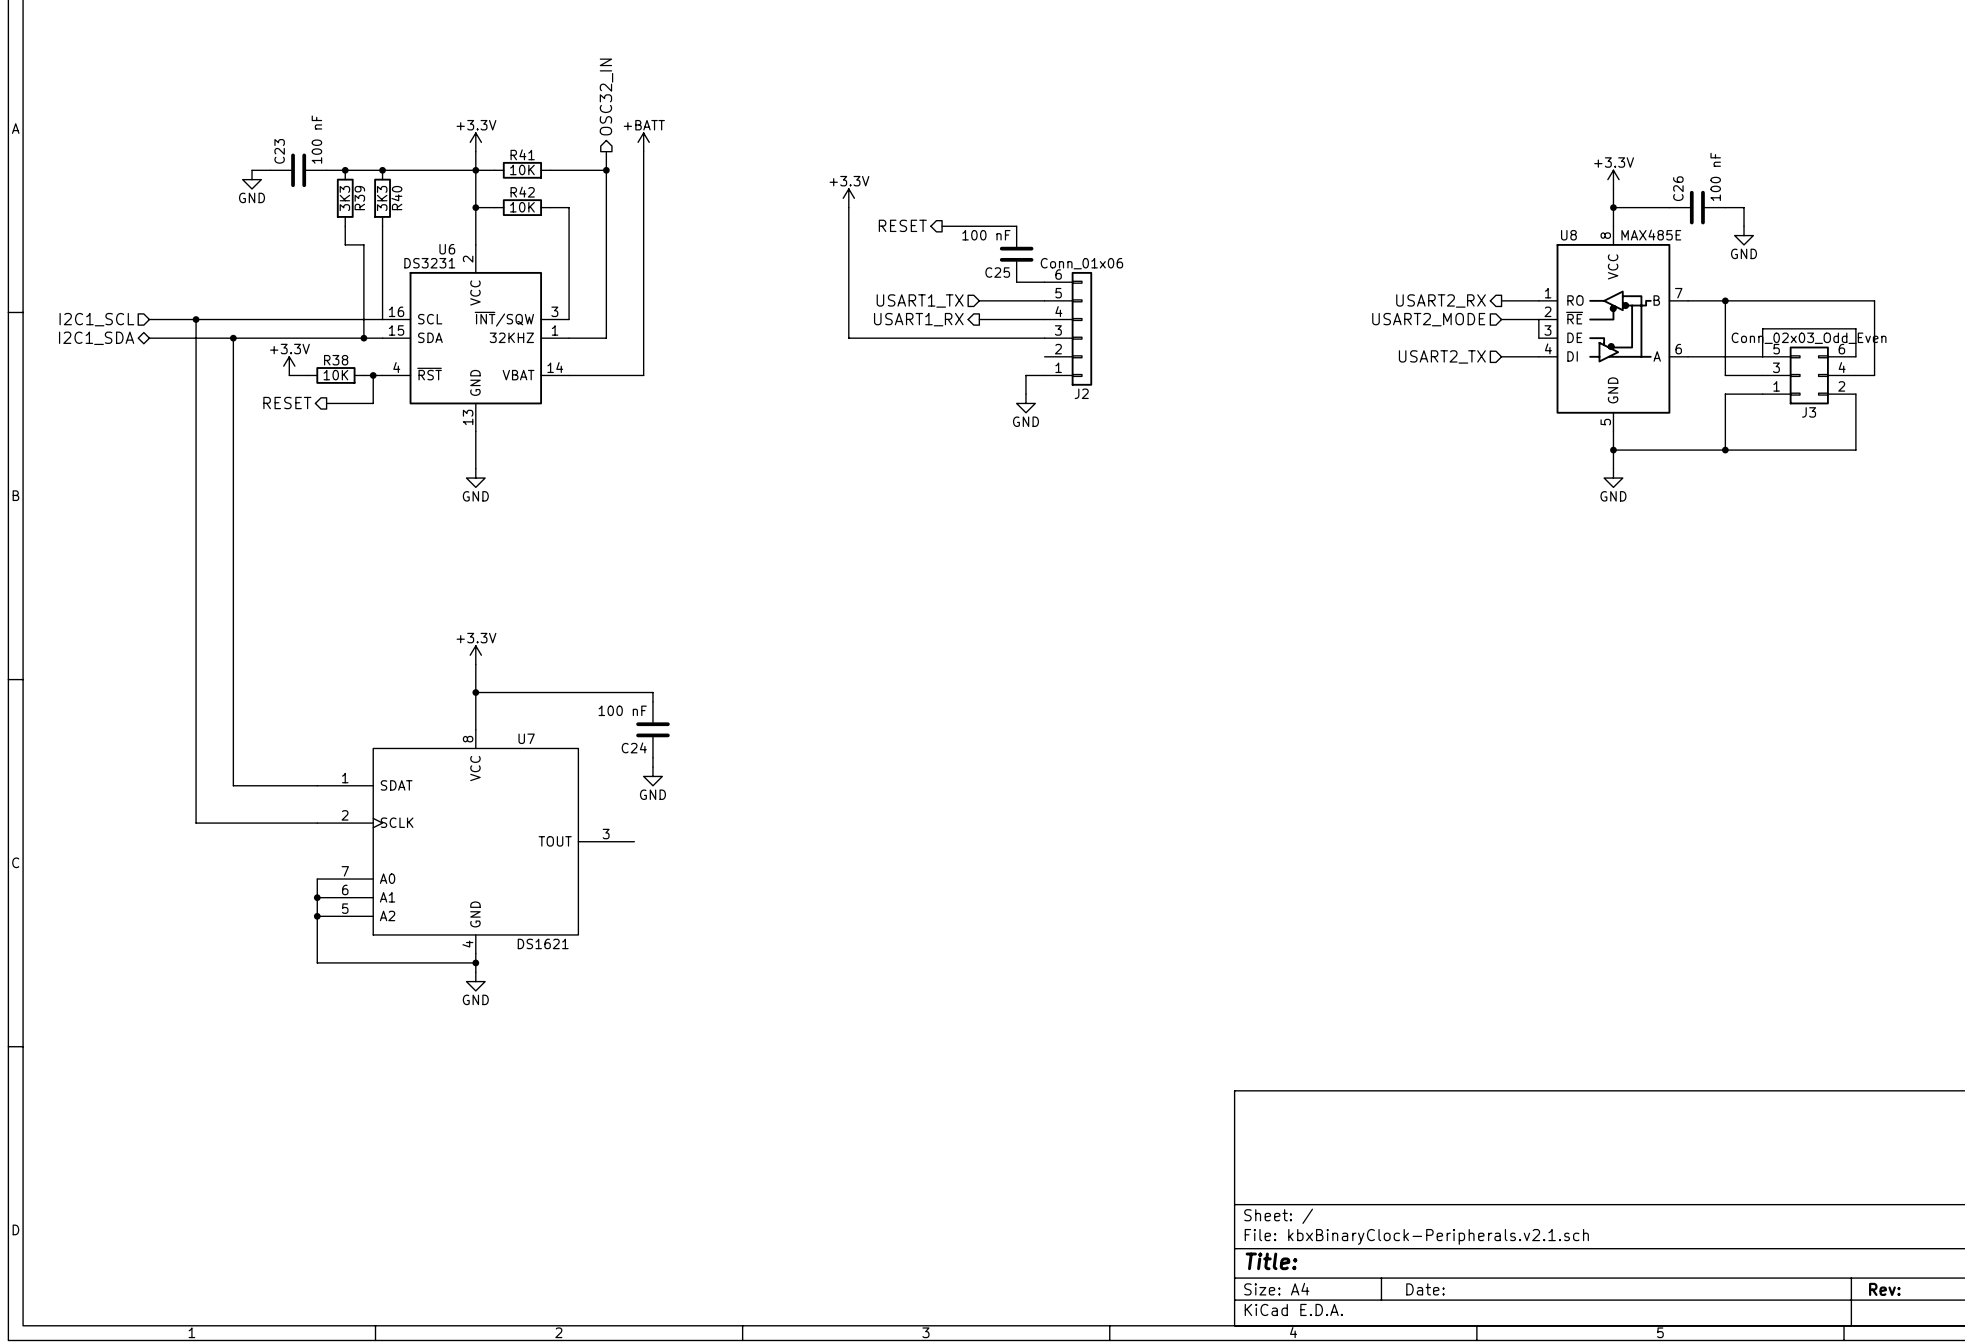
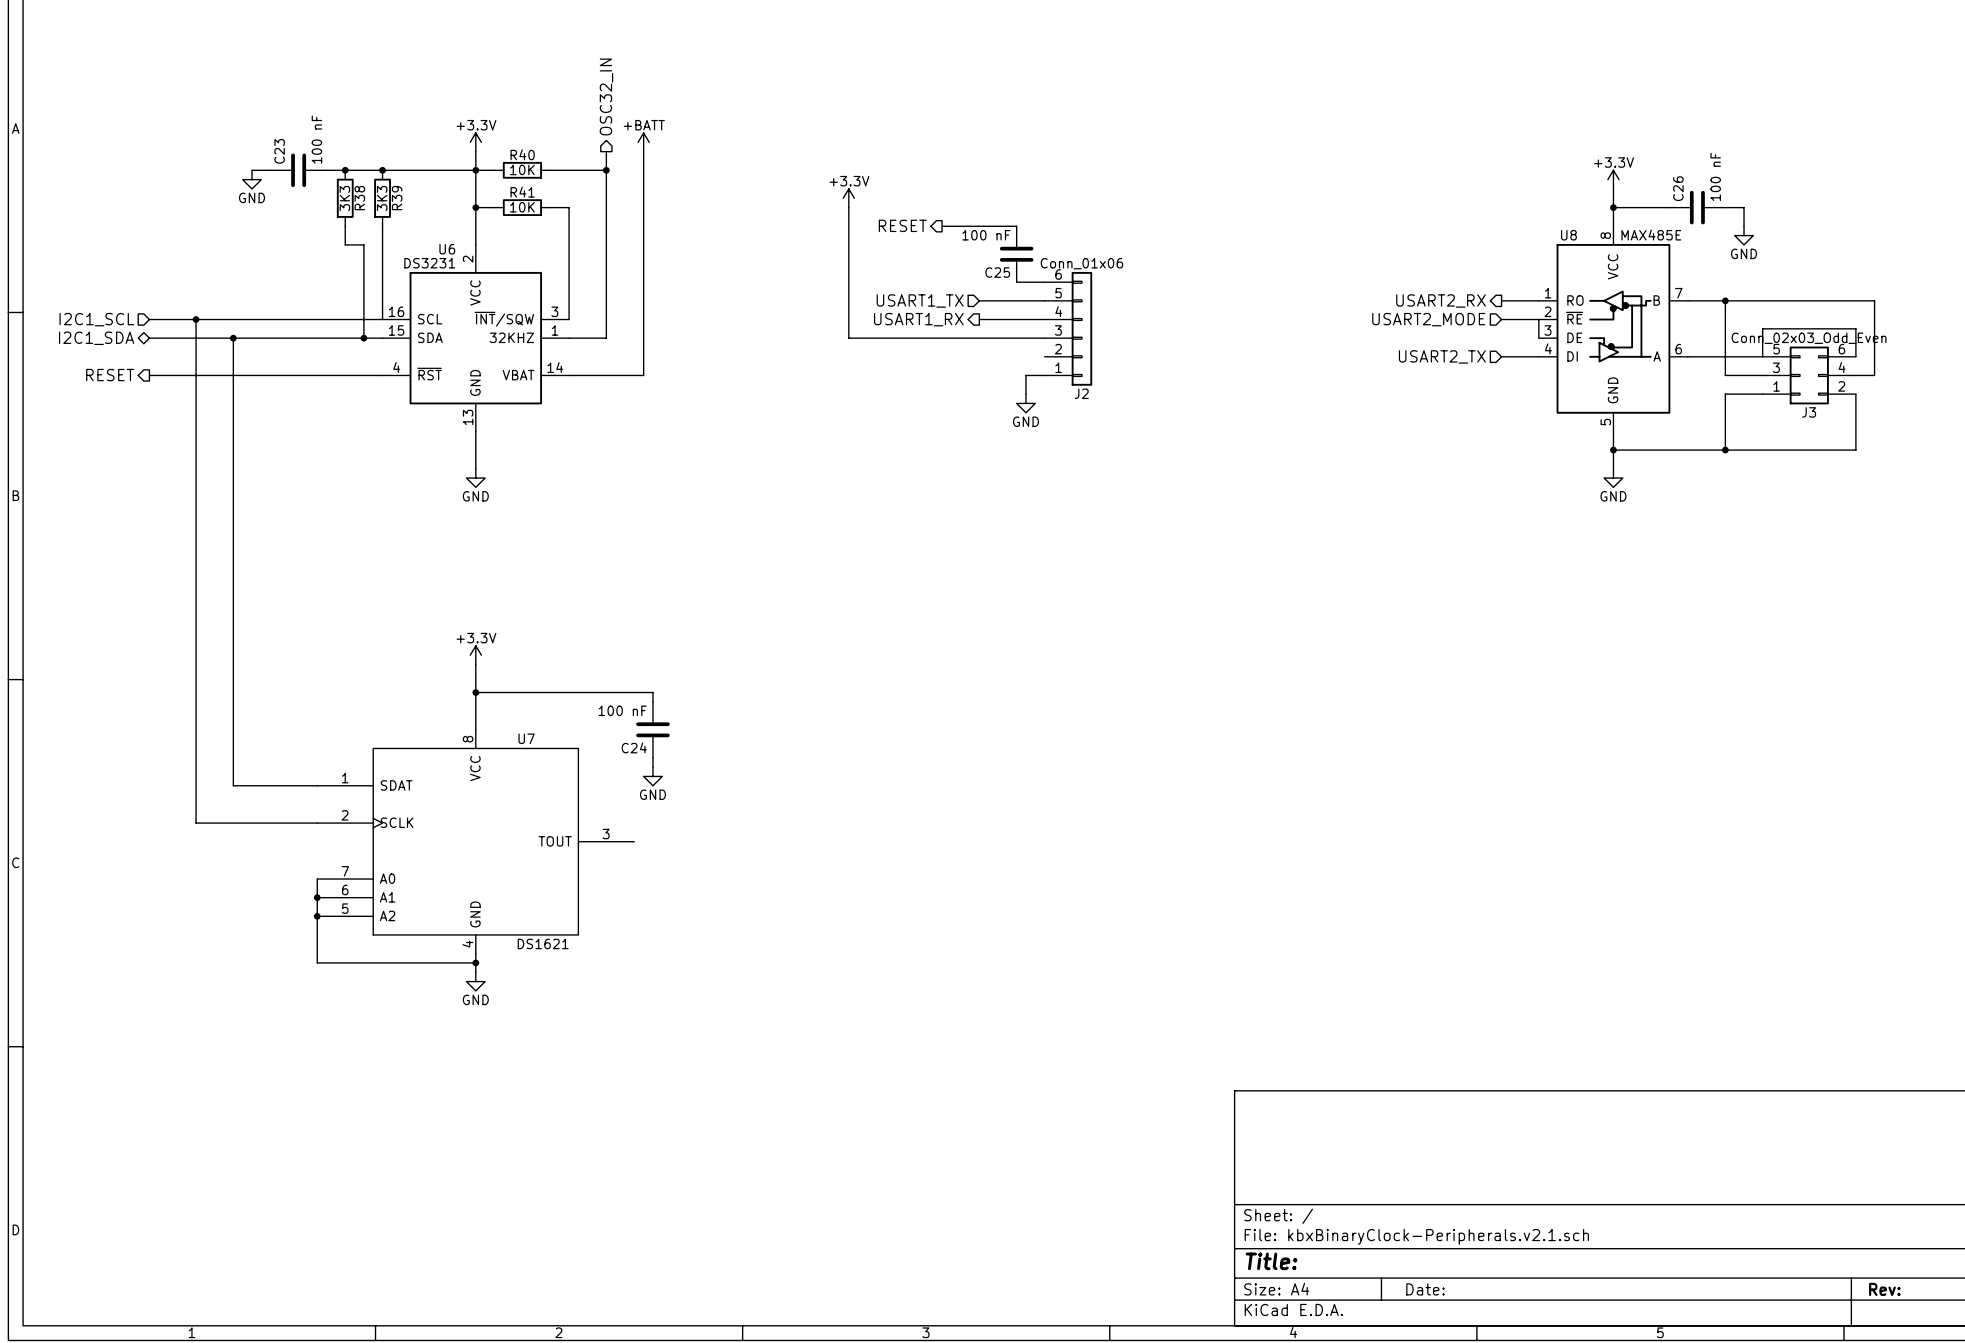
R41 name: R41 (522, 154) -> R40 (522, 154)
R42 name: R42 (522, 192) -> R41 (522, 192)
R39 name: R39 (359, 198) -> R38 (359, 198)
R40 name: R40 (396, 198) -> R39 (397, 198)
power symbol: +3.3V (289, 366) -> none
wire: none -> (149, 375) (289, 375)
R38: 10K (335, 375) -> none
wire: (373, 375) (373, 403) (326, 403) -> none
junction: (373, 375) -> none
hierarchical label position: RESET (287, 403) -> RESET (110, 375)

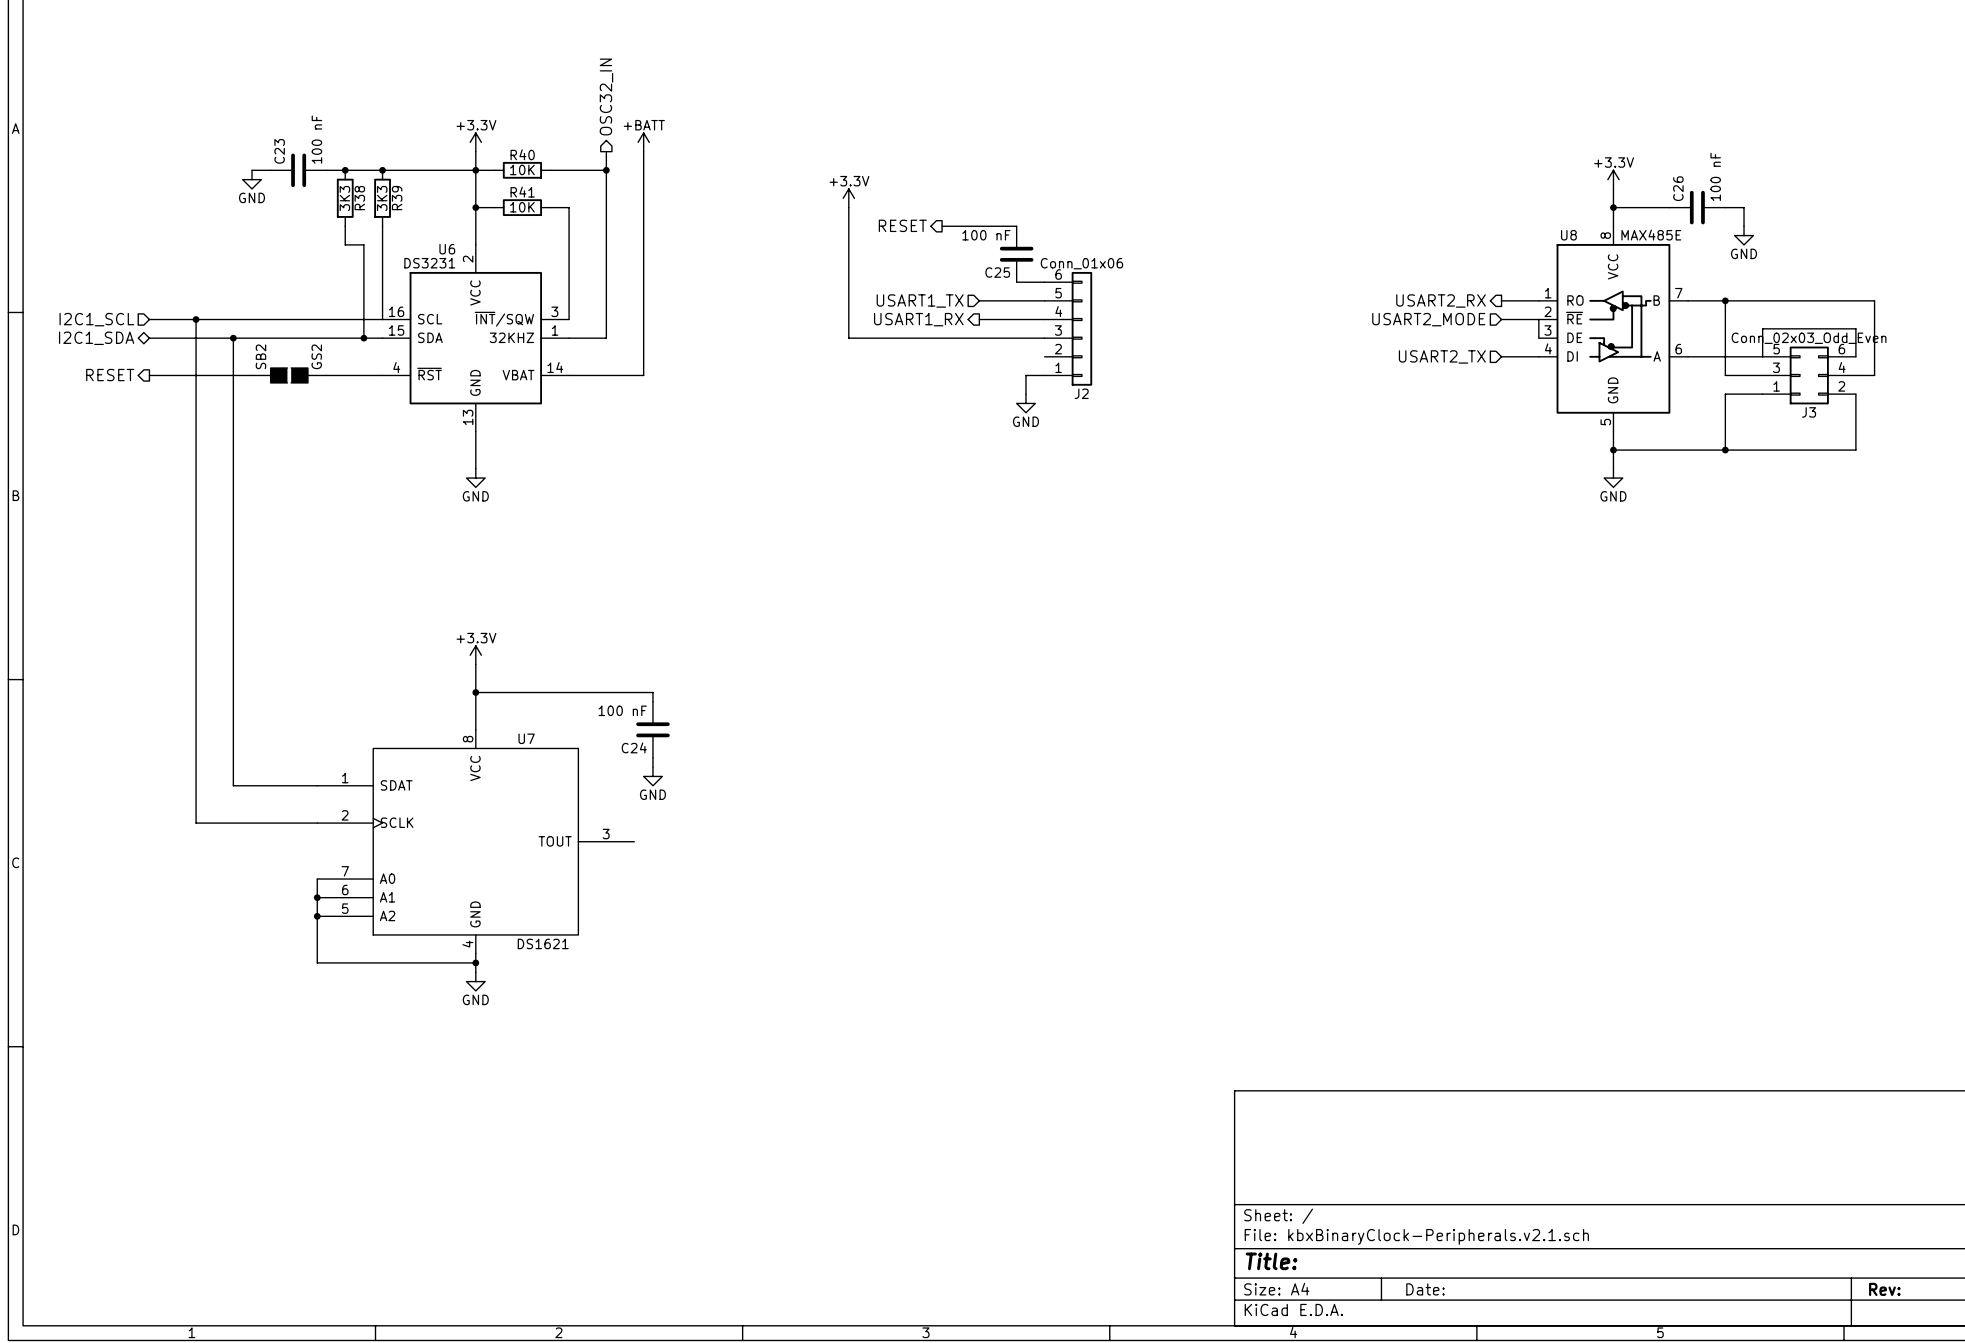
SB2: none -> GS2 (289, 375)

